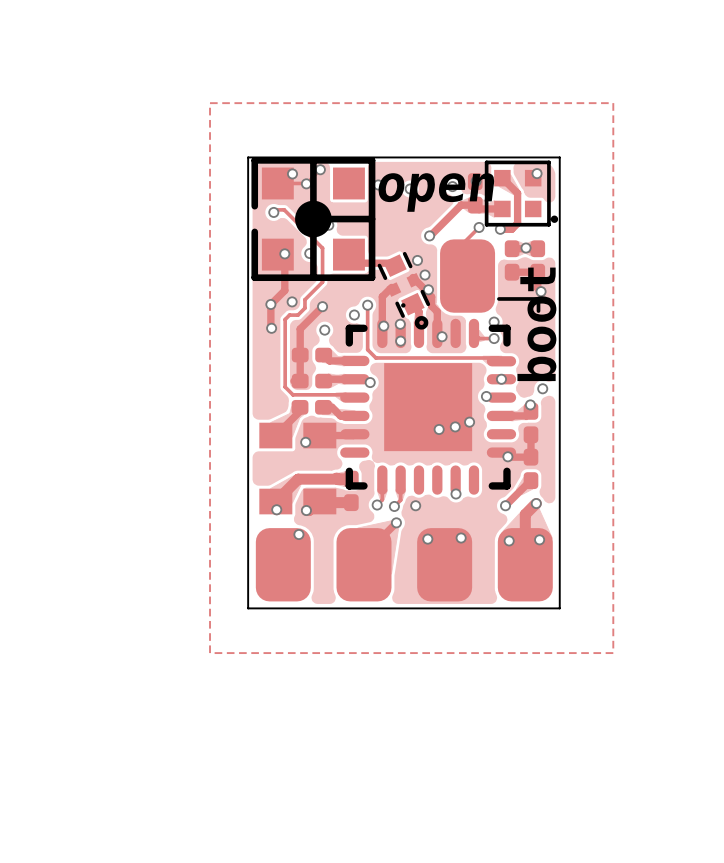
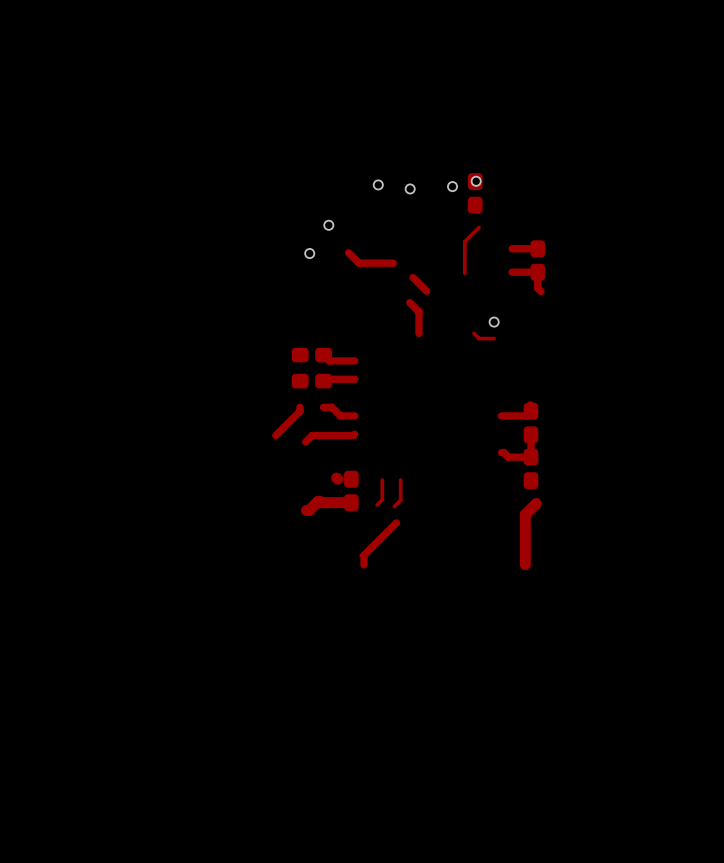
zone outline: (210, 103) (613, 103) (613, 653) (210, 653) (210, 103) -> none
board edge: (248, 157) (559, 157) (559, 608) (248, 608) (248, 157) -> none
via: (320, 169) -> none
via: (292, 173) -> none
via: (537, 173) -> none
track: (502, 178) (517, 193) (517, 223) (511, 229) (500, 229) -> none
via: (306, 183) -> none
text: open (436, 192) -> none
part: (521, 193) -> none
track: (502, 208) (479, 208) (475, 205) (461, 205) (431, 234) -> none
track: (273, 212) (276, 209) (284, 209) (322, 248) (322, 282) (304, 299) (304, 308) (297, 315) (289, 315) (285, 319) (285, 387) (292, 394) (352, 394) (354, 397) -> none
via: (273, 212) -> none
part: (313, 219) -> none
via: (479, 227) -> none
via: (500, 229) -> none
via: (429, 235) -> none
via: (526, 248) -> none
track: (284, 253) (284, 290) (270, 304) (271, 328) -> none
via: (284, 253) -> none
via: (417, 260) -> none
part: (512, 260) -> none
via: (425, 274) -> none
part: (467, 276) -> none
track: (391, 287) (382, 296) (382, 333) -> none
via: (428, 289) -> none
part: (403, 290) -> none
via: (541, 291) -> none
track: (426, 292) (431, 296) (431, 306) (437, 311) (437, 333) -> none
line: (498, 298) (538, 298) (538, 311) -> none
via: (292, 301) -> none
via: (270, 304) -> none
track: (367, 305) (367, 349) (375, 357) (498, 357) (501, 361) -> none
via: (367, 305) -> none
track: (322, 306) (300, 329) (300, 381) (293, 381) -> none
via: (322, 306) -> none
via: (354, 315) -> none
via: (400, 324) -> none
text: boot (536, 324) -> none
via: (383, 326) -> none
via: (271, 328) -> none
via: (324, 330) -> none
via: (442, 336) -> none
via: (494, 338) -> none
via: (400, 341) -> none
via: (501, 379) -> none
via: (370, 382) -> none
via: (542, 388) -> none
via: (486, 396) -> none
via: (530, 404) -> none
part: (428, 406) -> none
part: (311, 407) -> none
via: (469, 422) -> none
via: (455, 426) -> none
via: (439, 429) -> none
via: (305, 442) -> none
via: (507, 456) -> none
part: (297, 468) -> none
track: (351, 479) (298, 479) (275, 501) (276, 509) -> none
track: (530, 480) (505, 505) -> none
via: (456, 494) -> none
via: (536, 503) -> none
via: (377, 505) -> none
via: (415, 505) -> none
via: (505, 505) -> none
via: (394, 506) -> none
via: (276, 509) -> none
via: (306, 510) -> none
via: (396, 522) -> none
via: (298, 534) -> none
via: (461, 538) -> none
via: (427, 539) -> none
via: (539, 539) -> none
via: (509, 540) -> none
part: (283, 564) -> none
part: (363, 564) -> none
part: (444, 564) -> none
part: (525, 564) -> none

